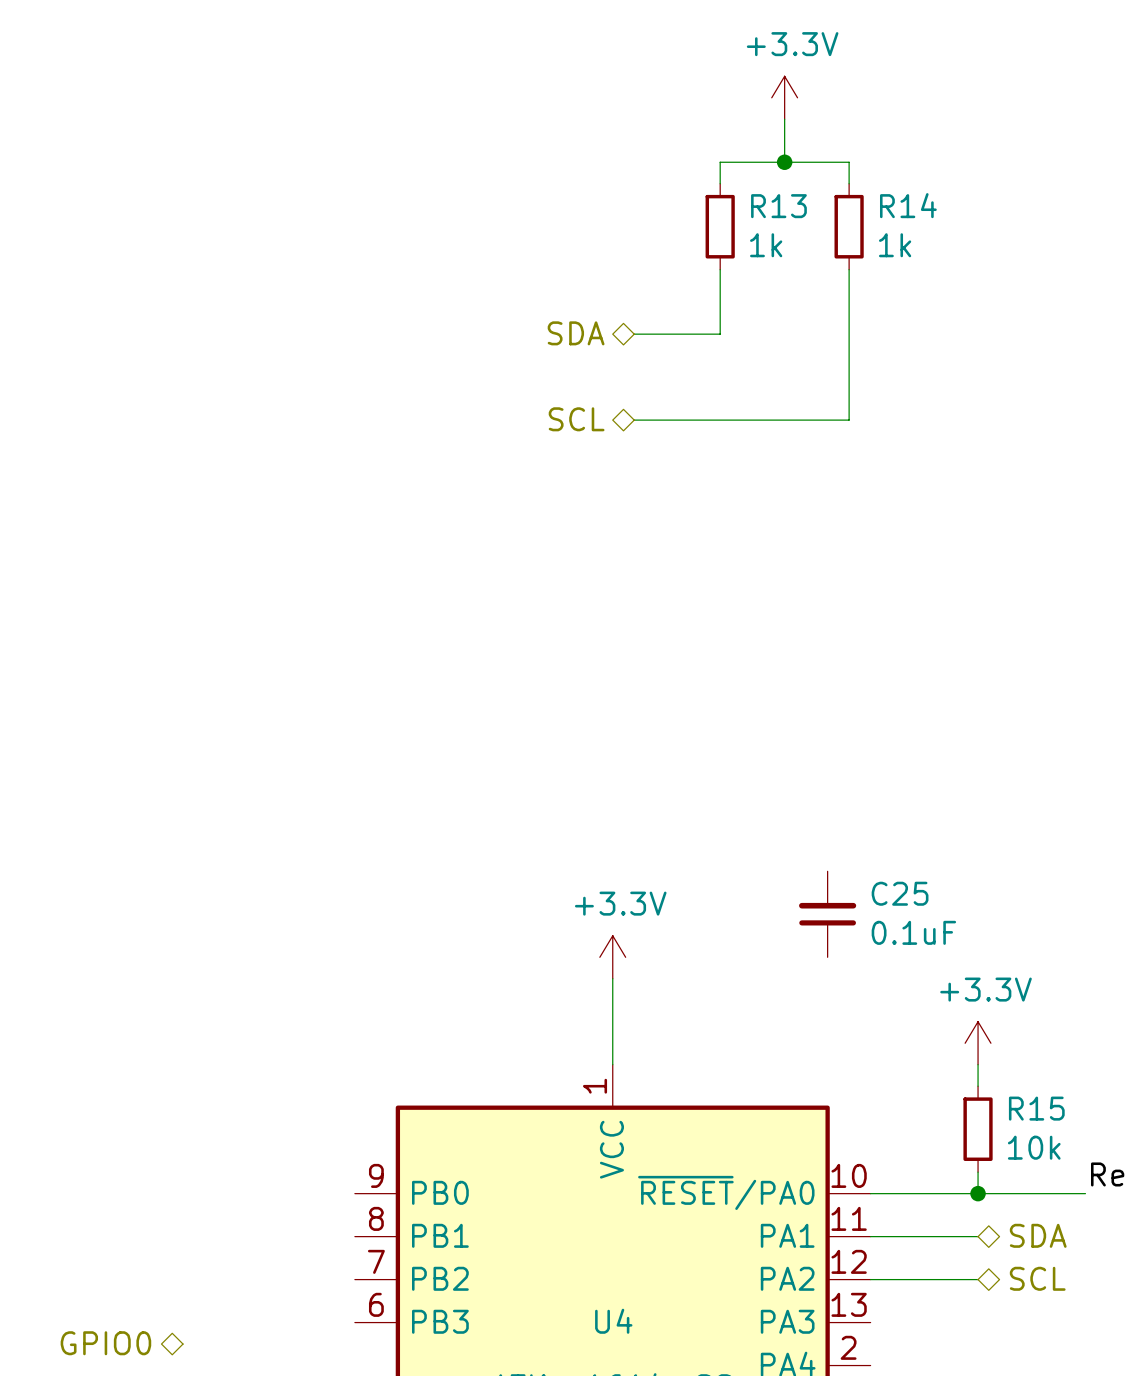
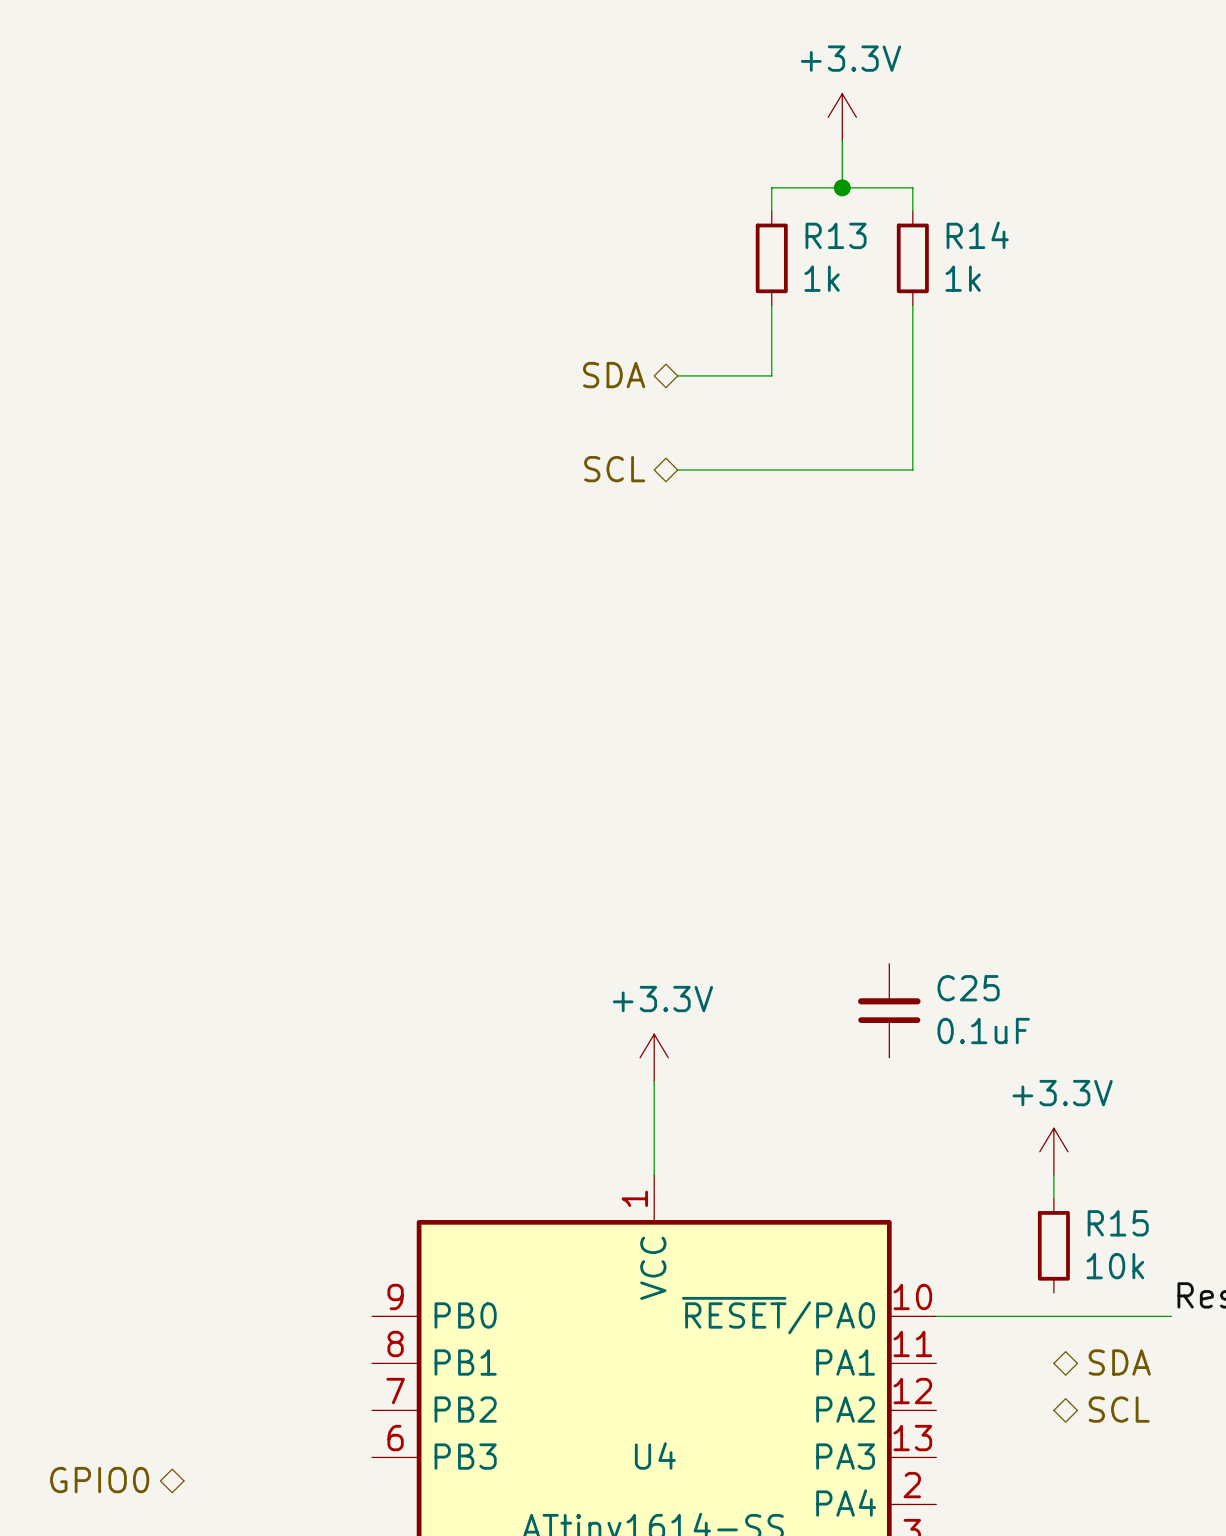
wire: (978, 1172) (978, 1193) -> none
junction: (978, 1193) -> none
wire: (870, 1236) (978, 1236) -> none
wire: (870, 1279) (978, 1279) -> none

